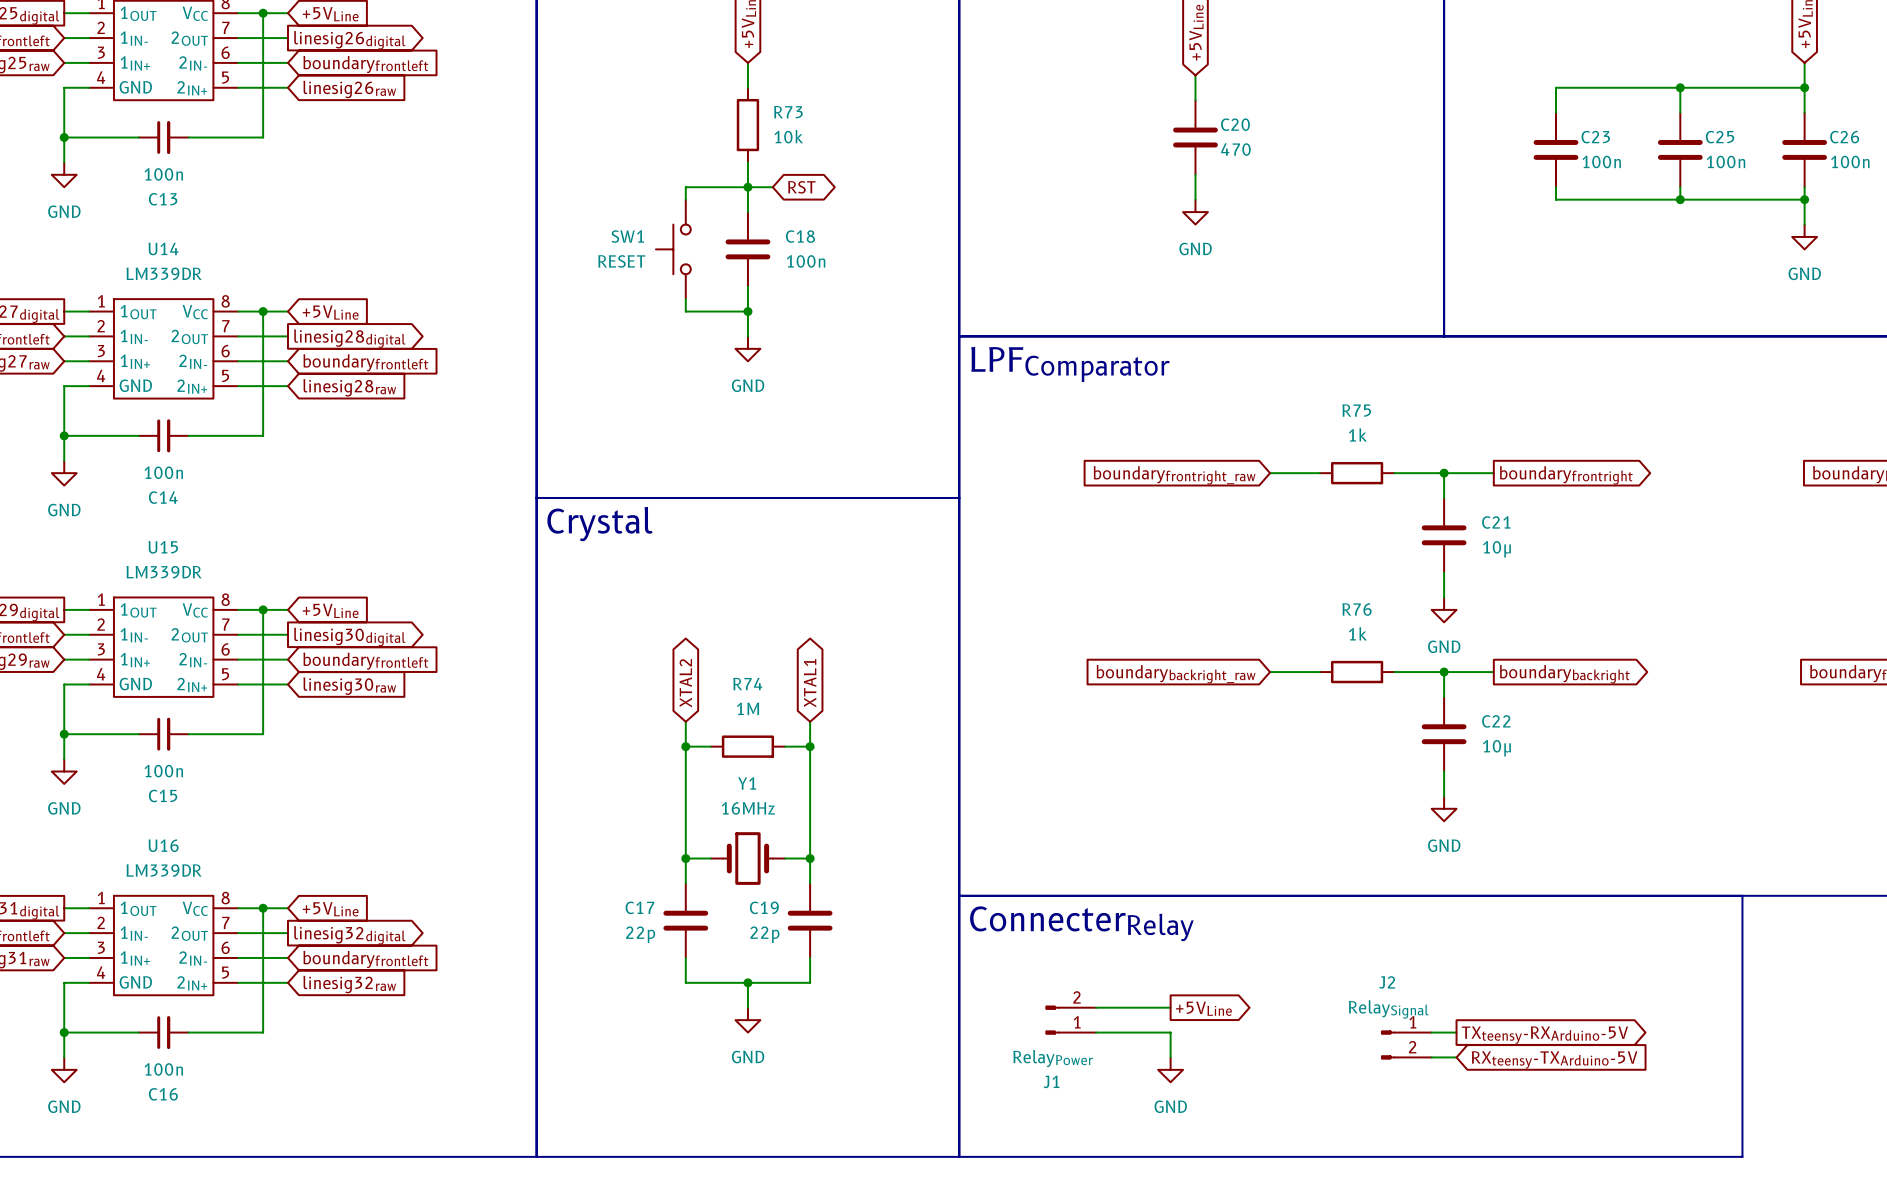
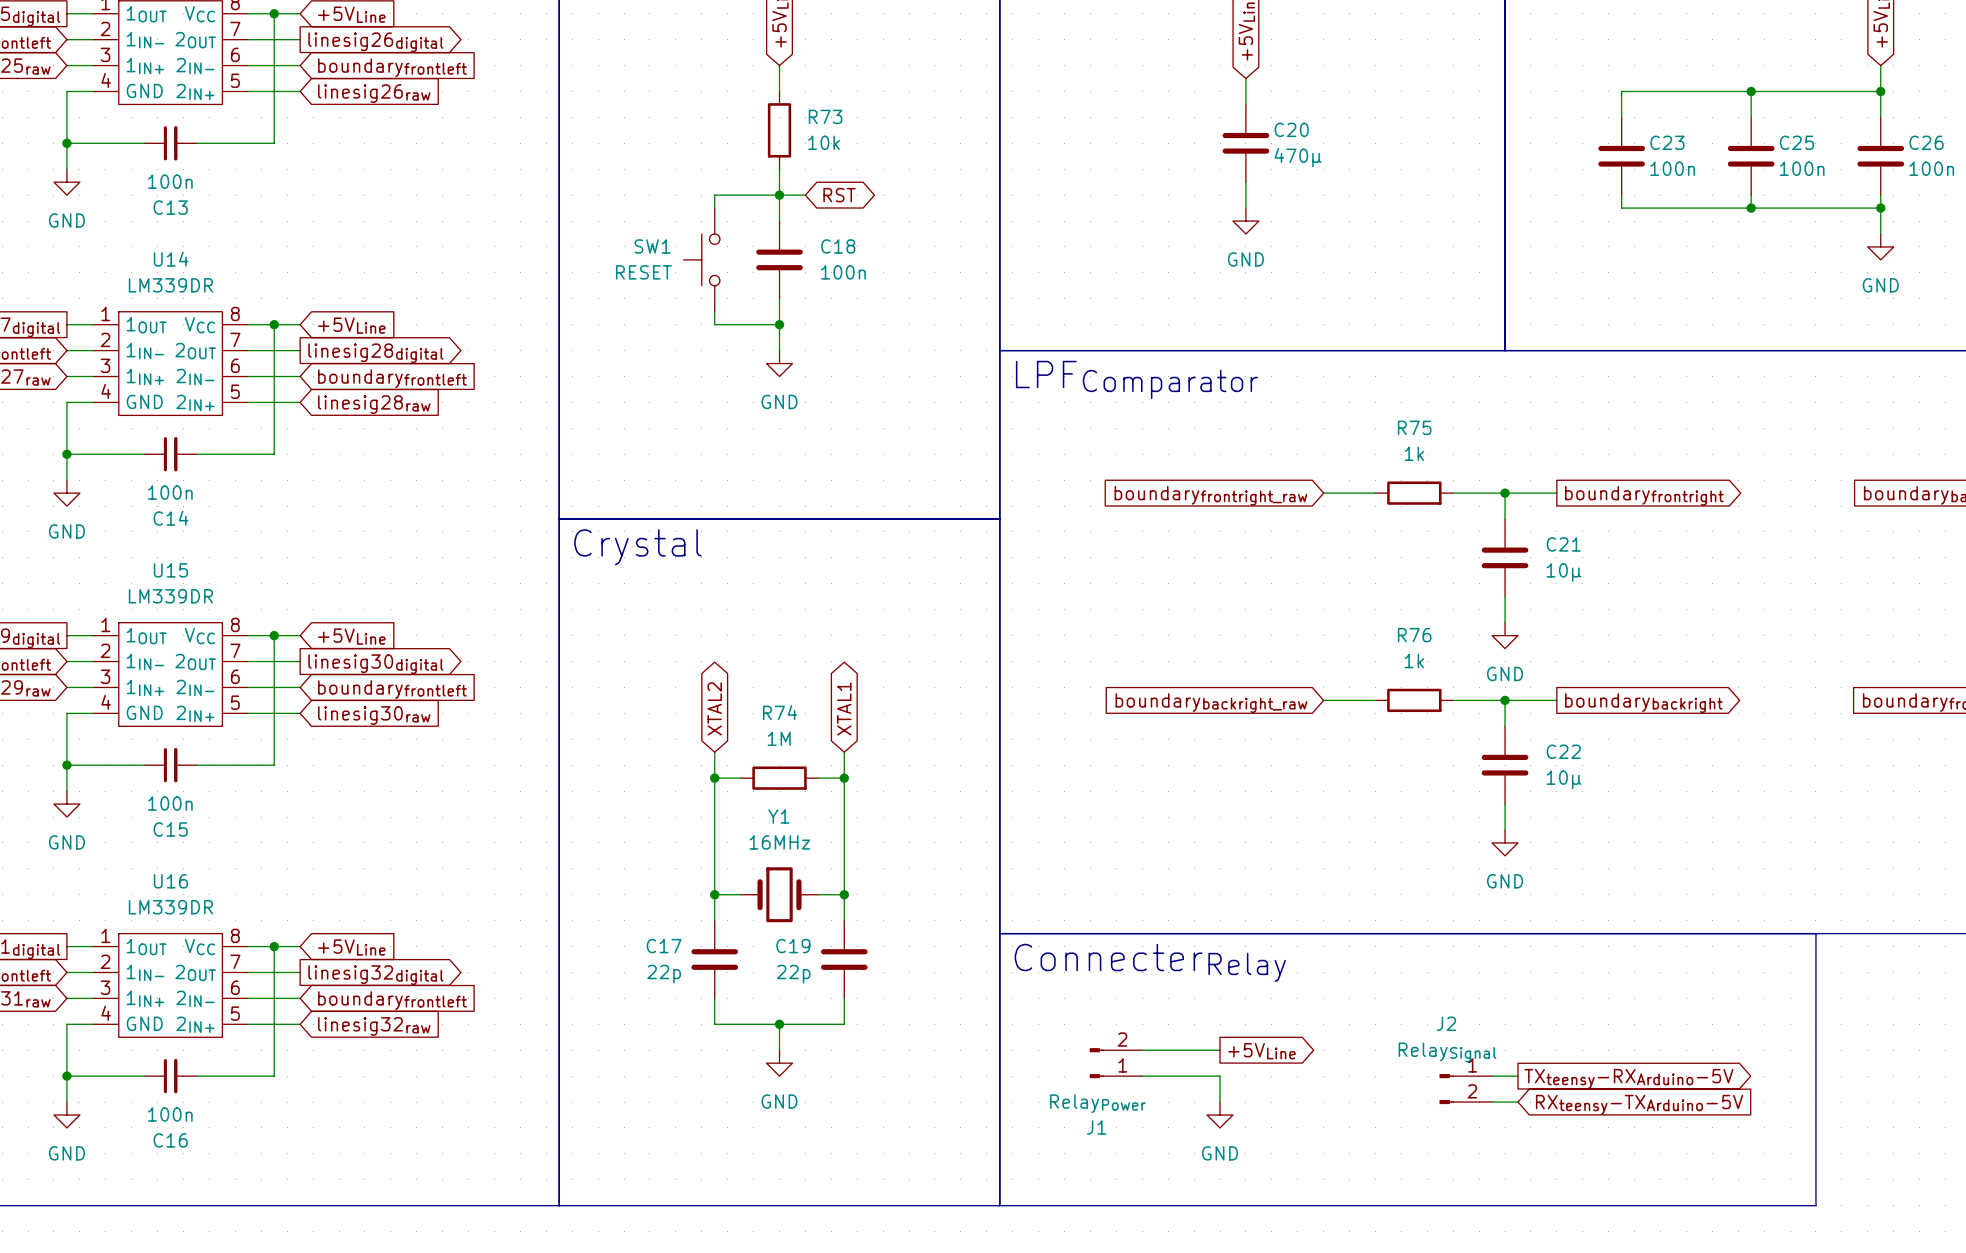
C20 value: 470 (1235, 149) -> 470μ (1298, 157)

